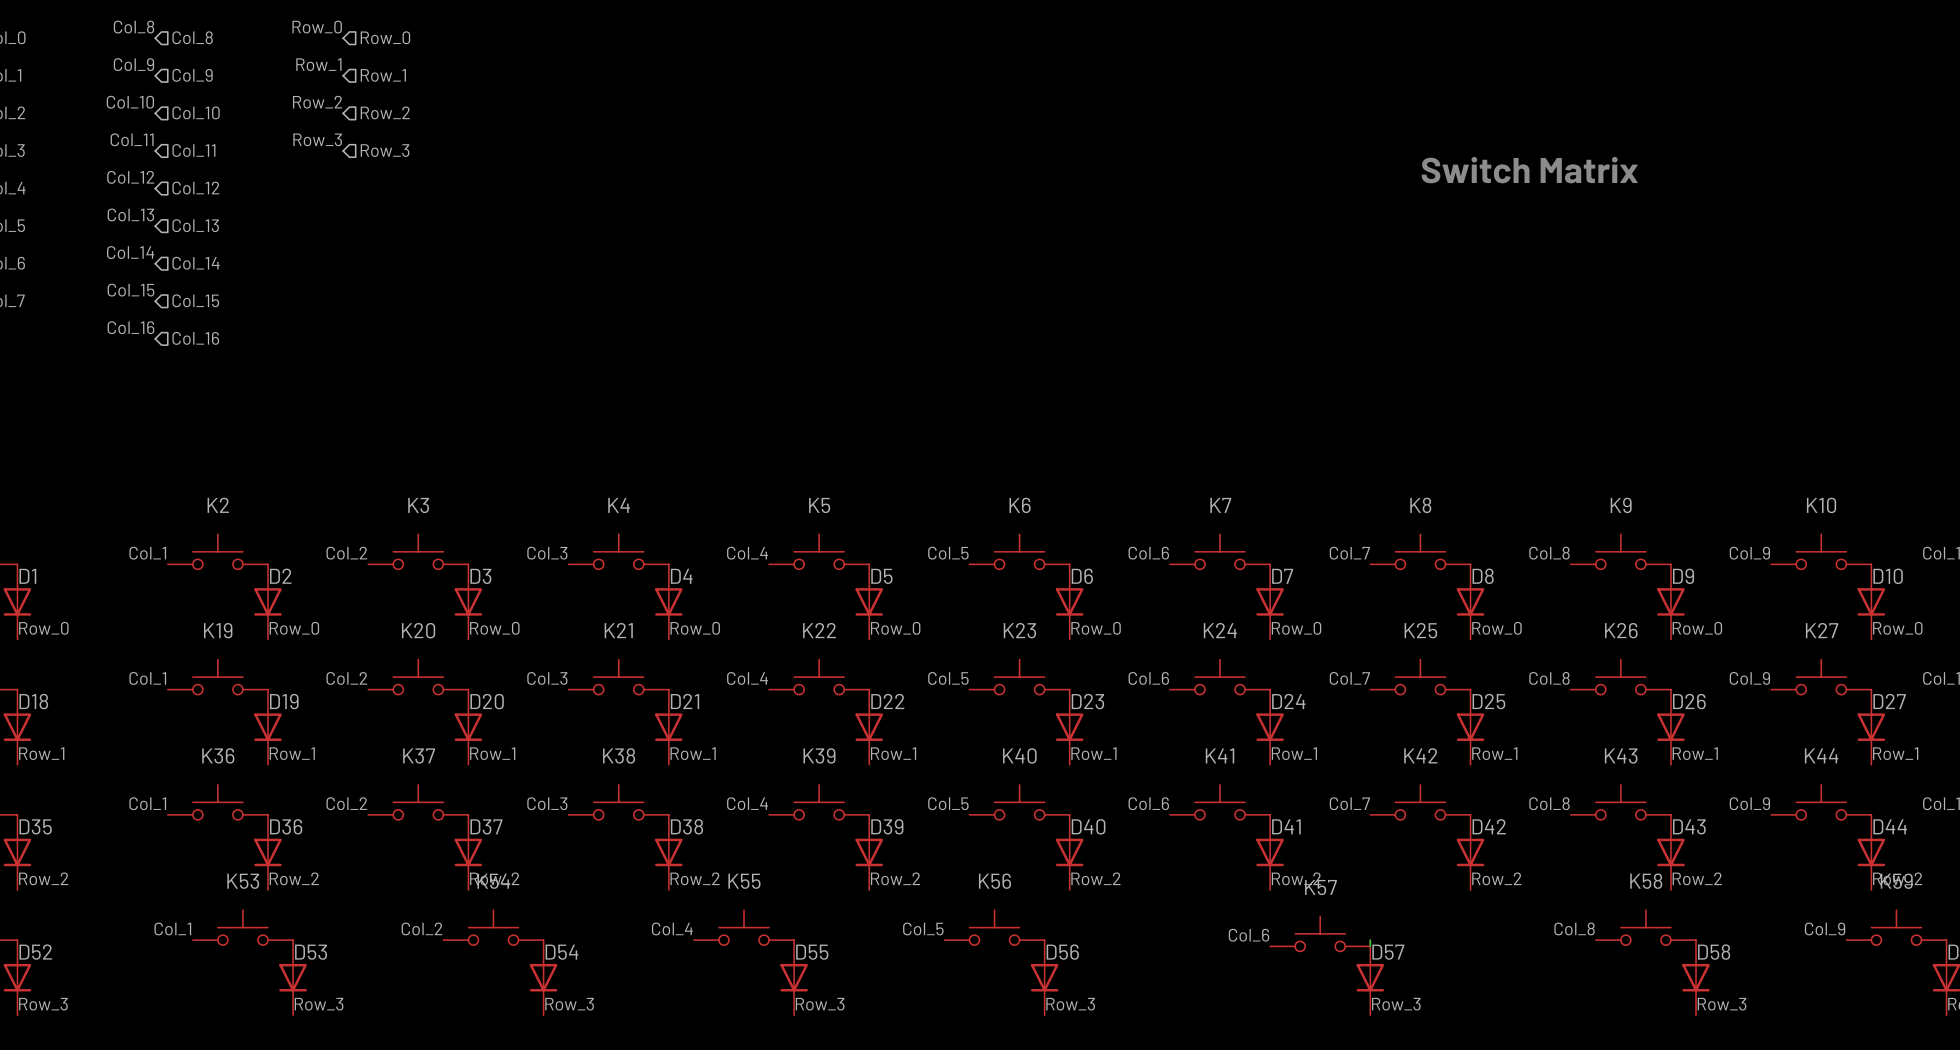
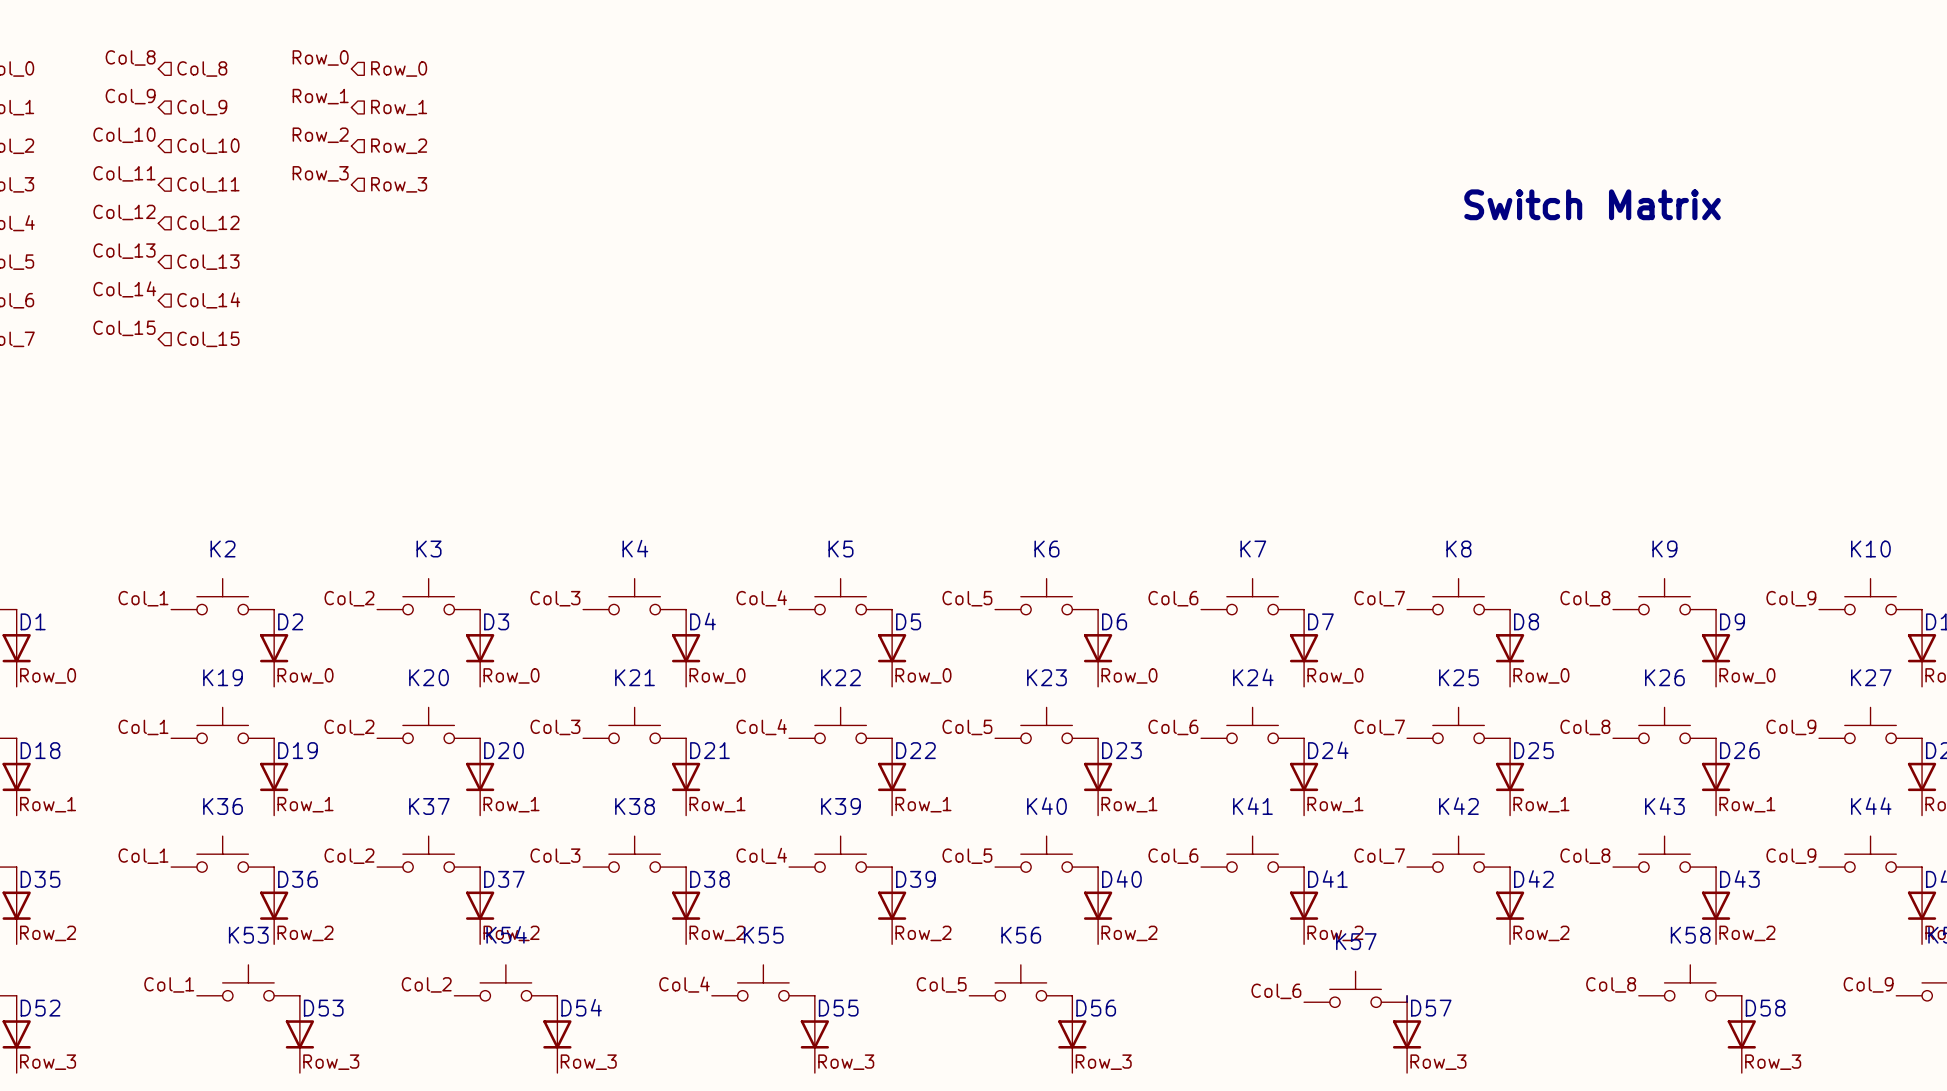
label: Col_16 (131, 327) -> none
hierarchical label: Col_16 (195, 338) -> none

